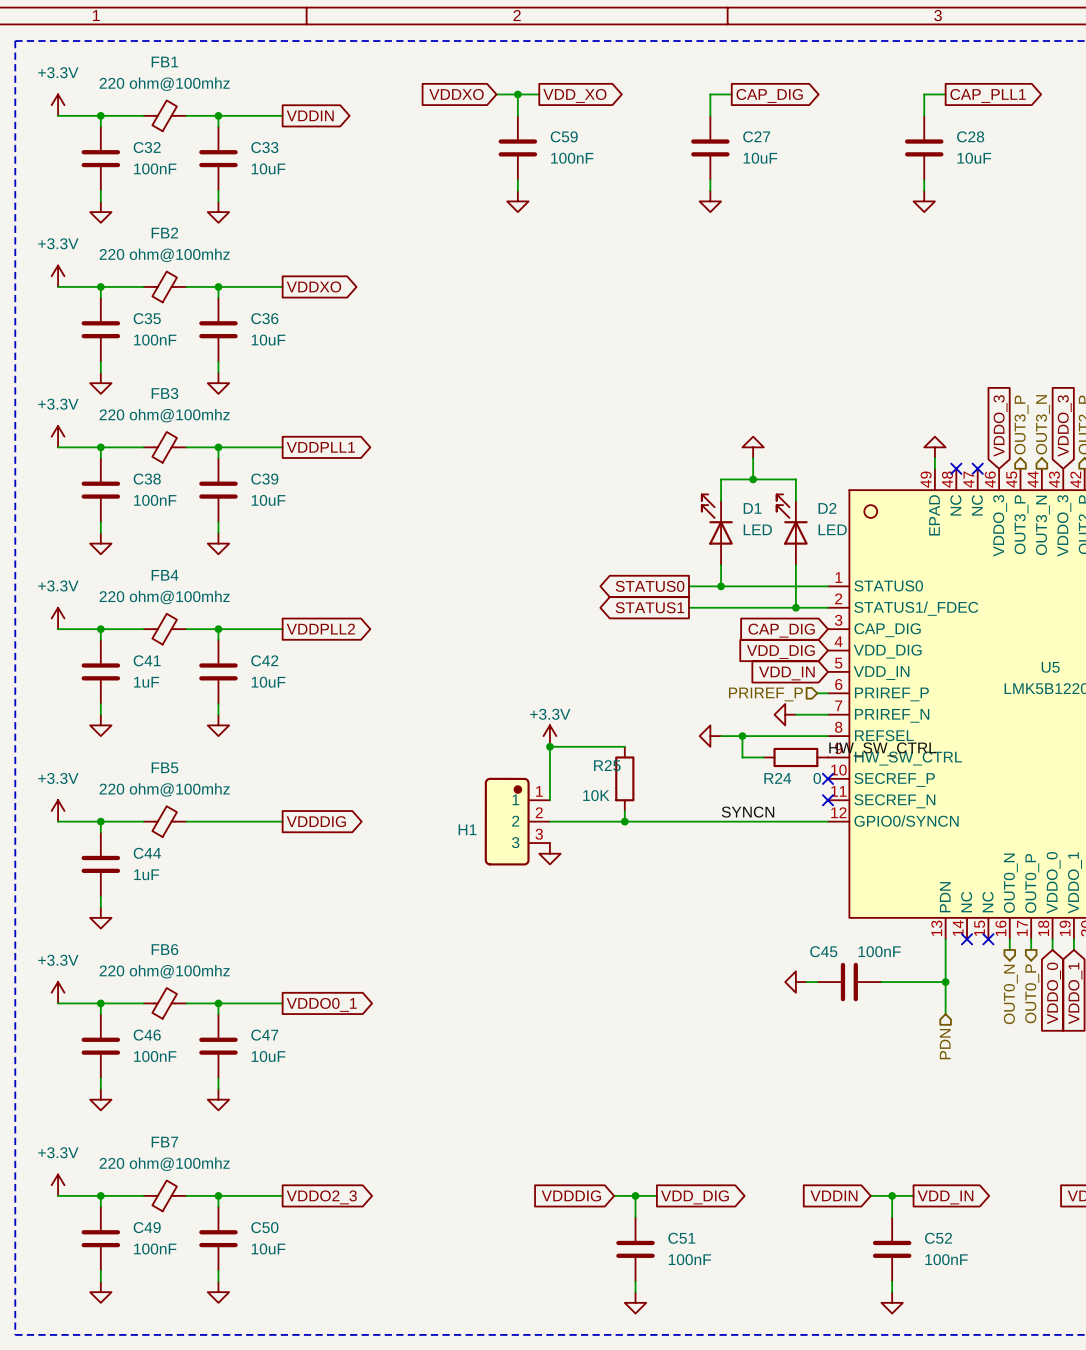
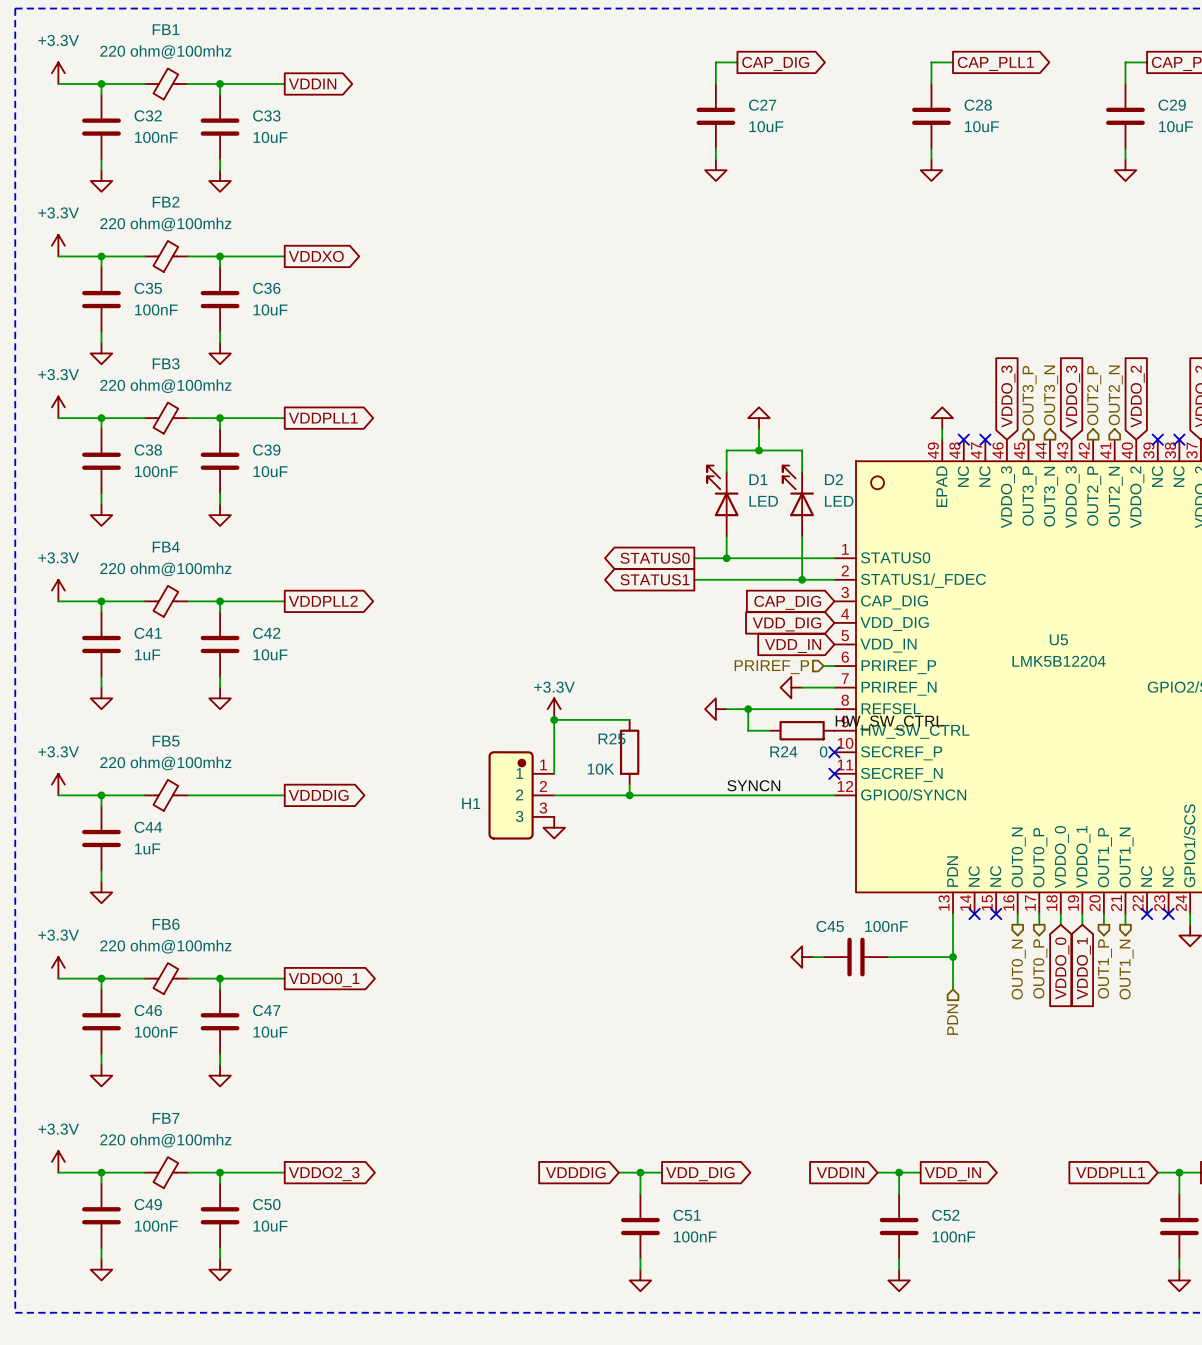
global label: VDDXO (456, 94) -> none
wire: (496, 94) (539, 94) -> none
wire: (517, 94) (517, 115) -> none
junction: (517, 94) -> none
global label: VDD_XO (574, 95) -> none
C59: 100nF (517, 147) -> none
wire: (517, 180) (517, 190) -> none
power symbol: (517, 201) -> none

